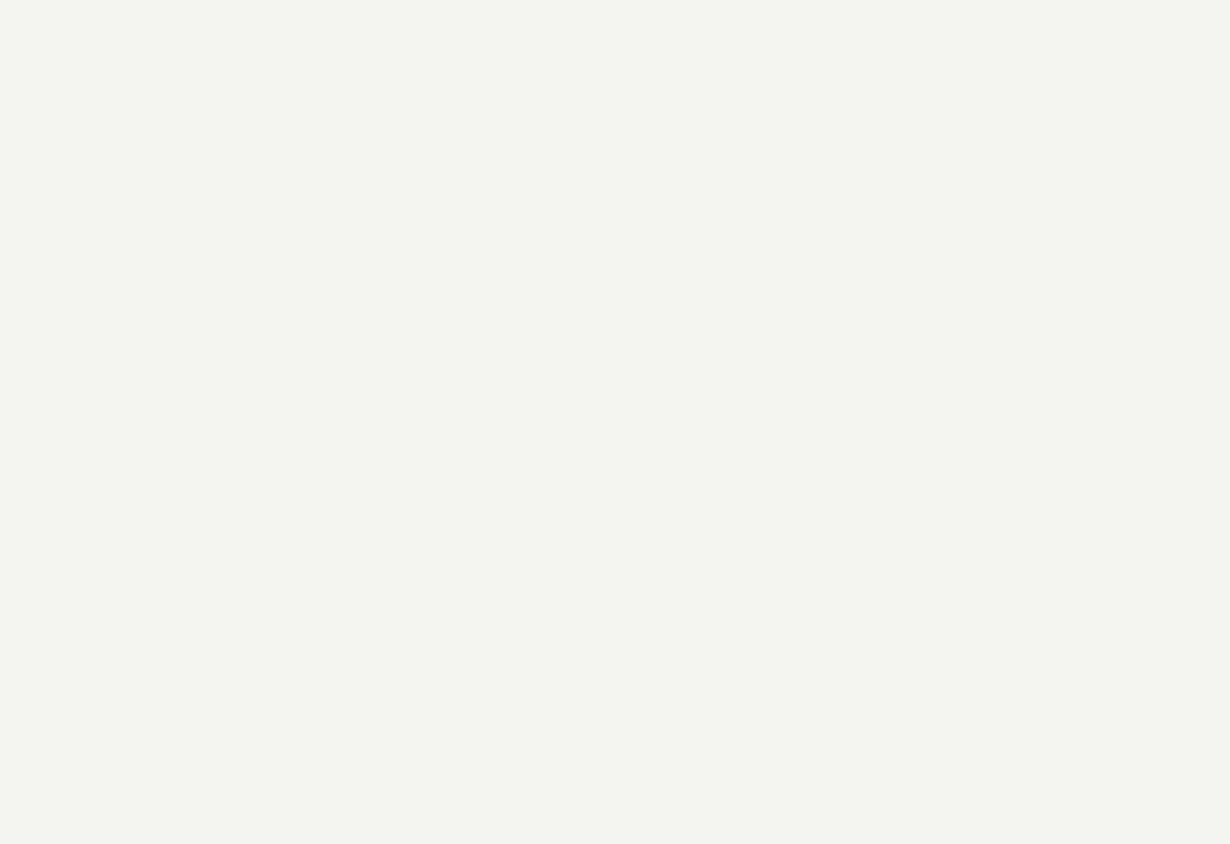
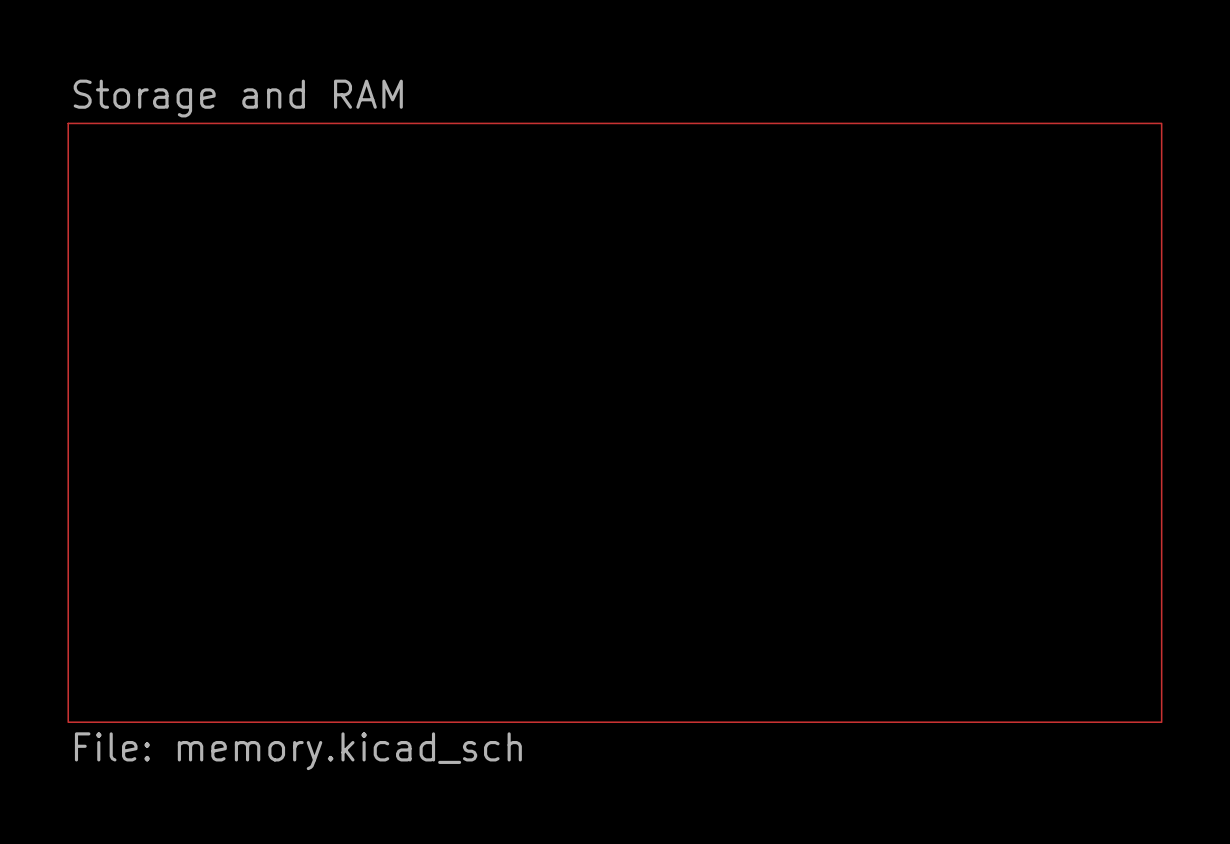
sheet Storage and RAM: none -> File: memory.kicad_sch (614, 422)

